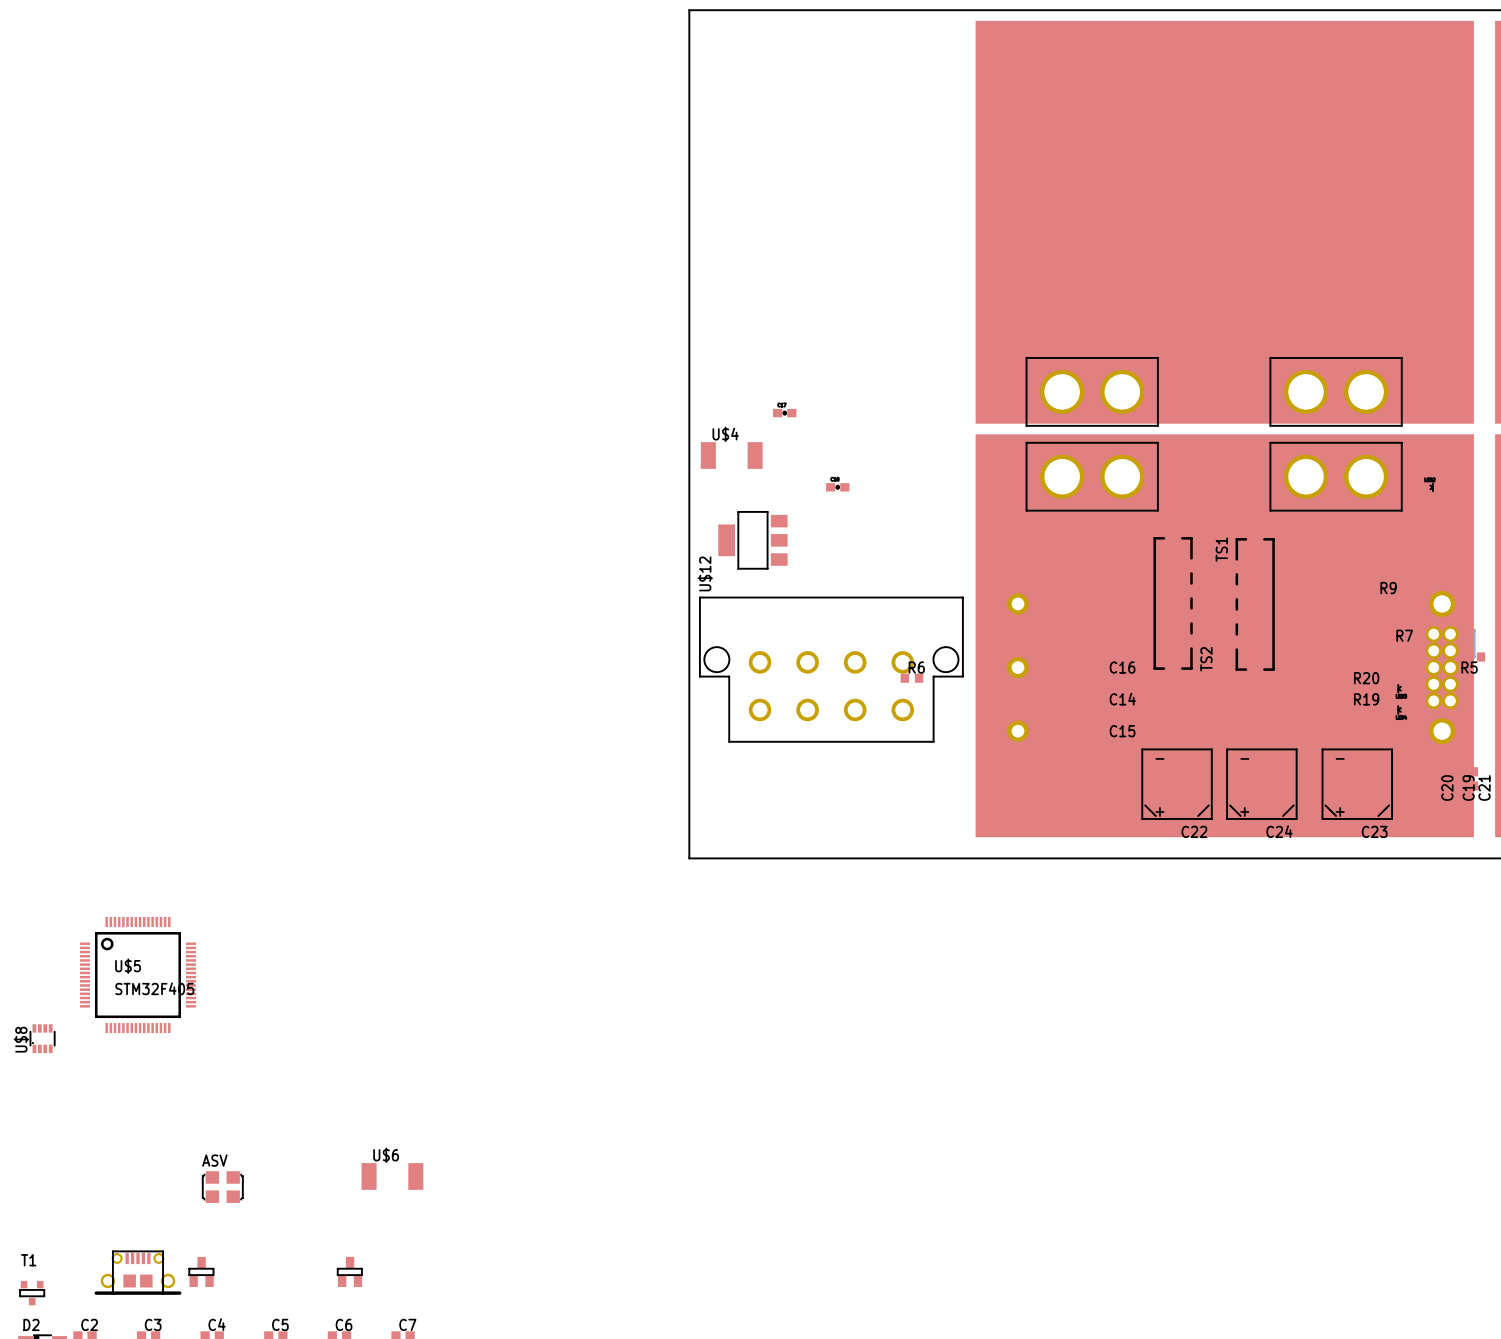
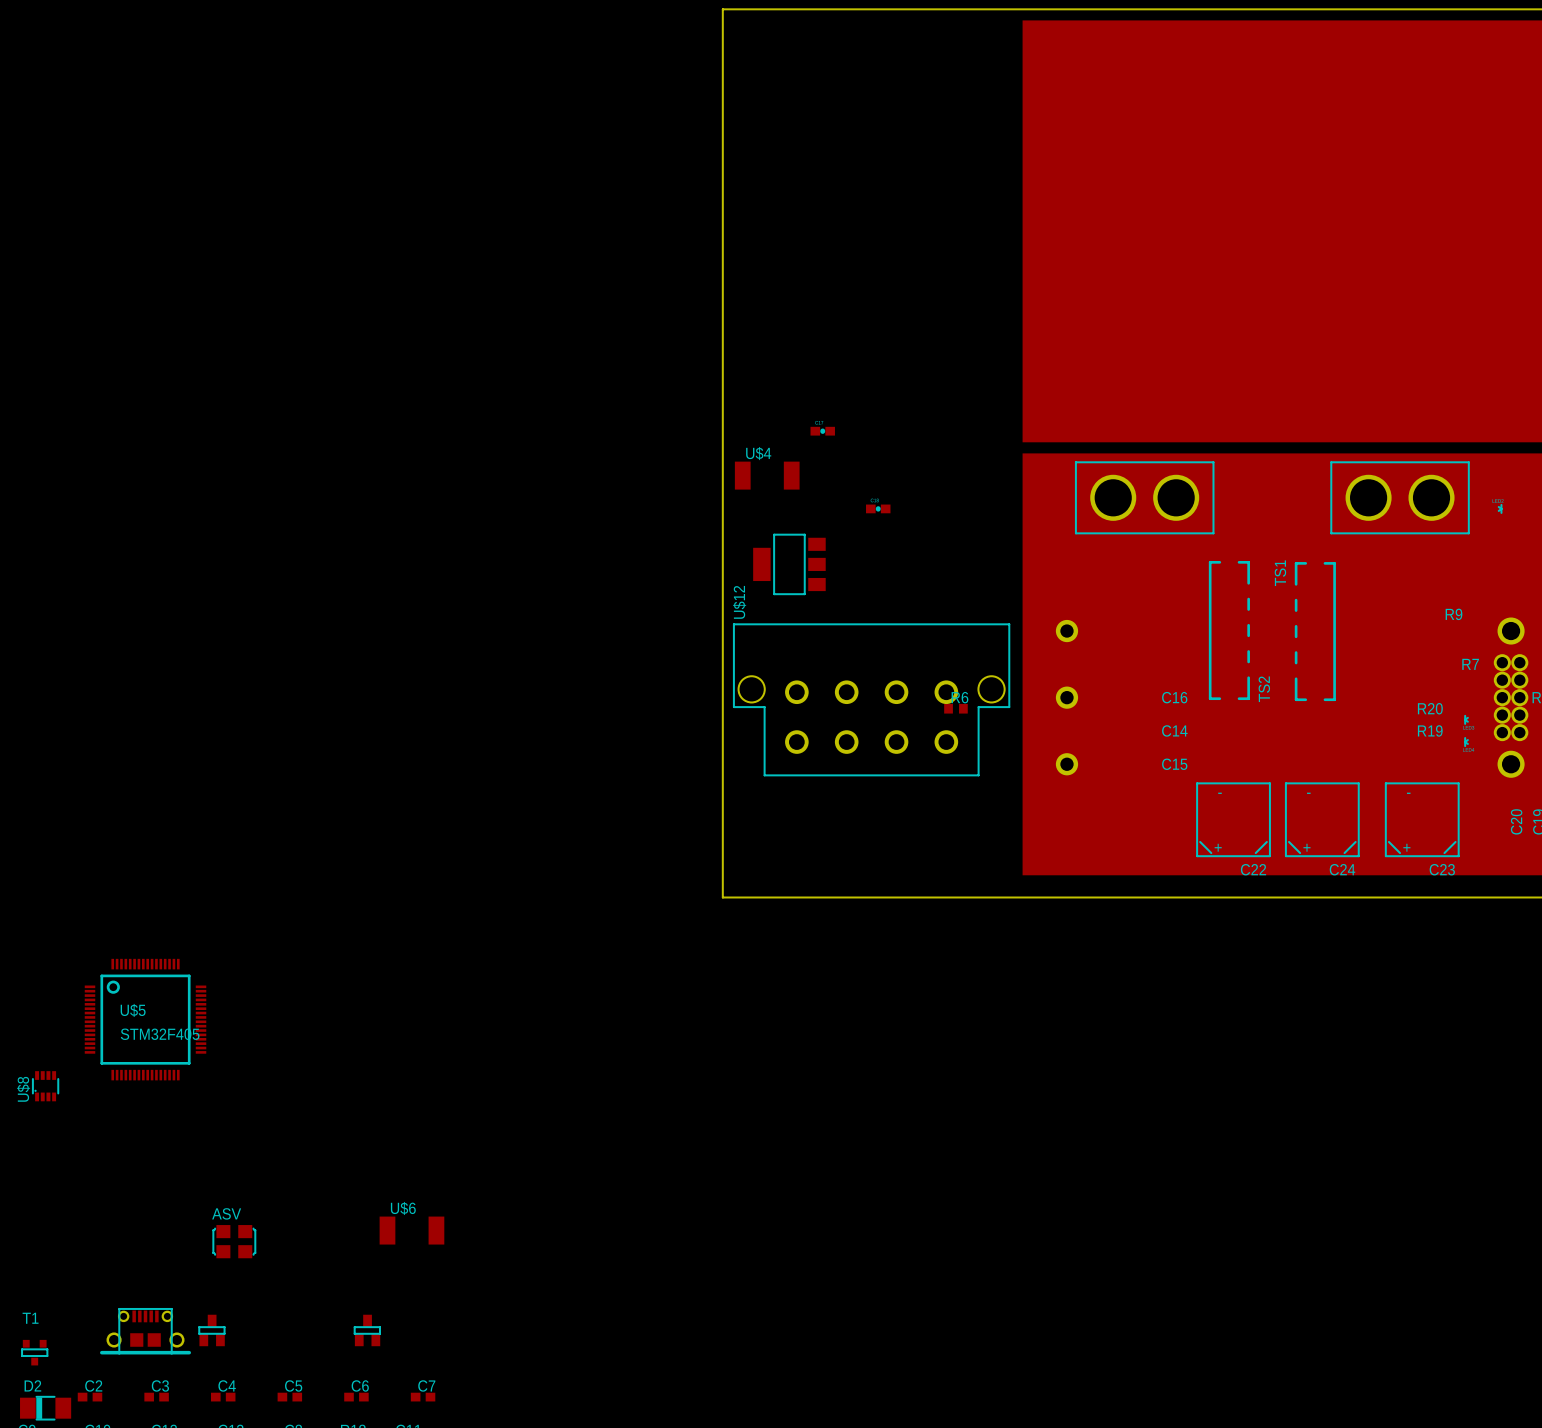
part: (1092, 391) -> none
part: (1336, 391) -> none

